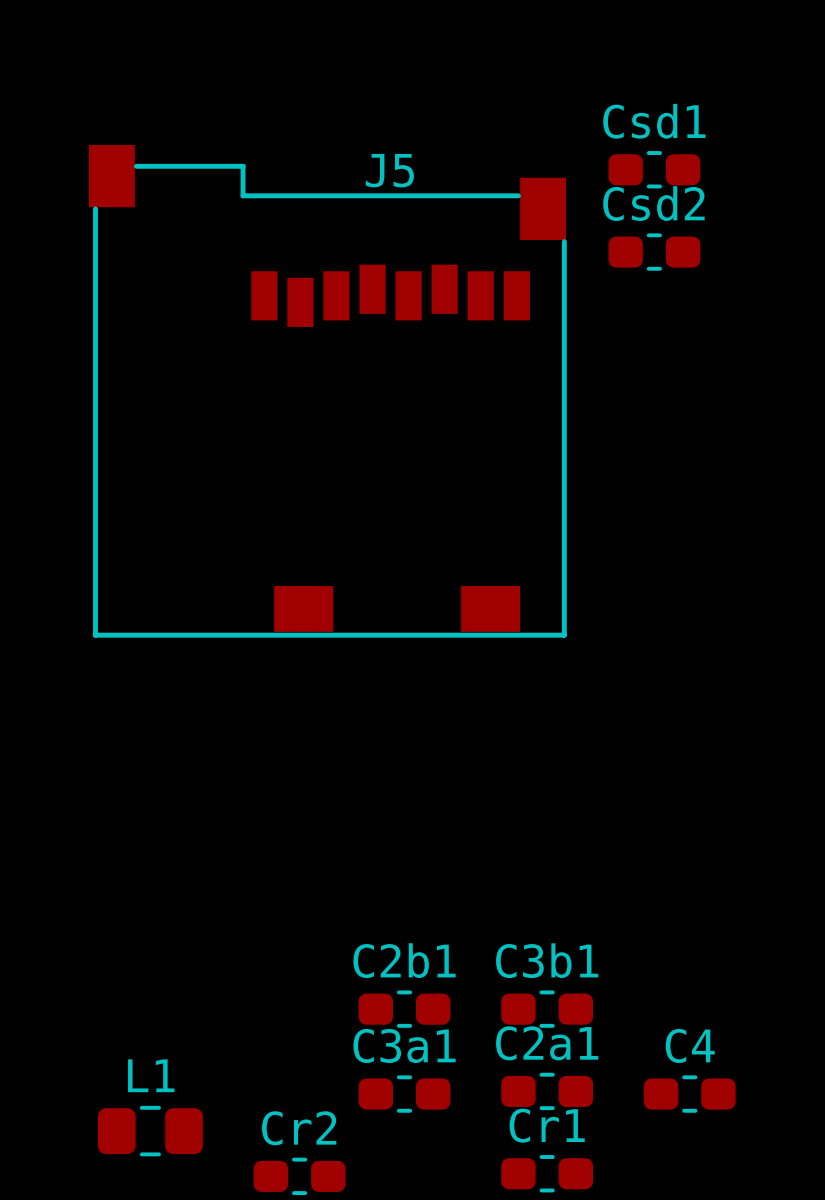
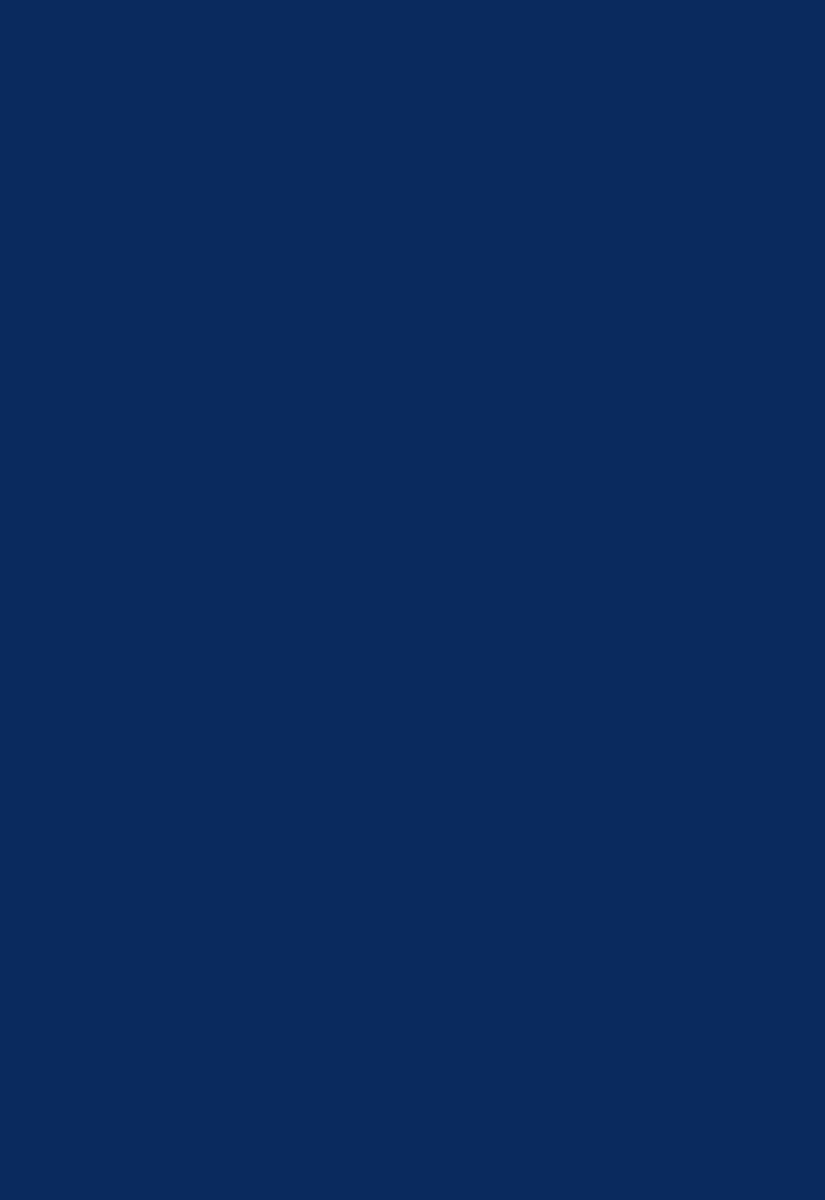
Csd1: (654, 169) -> none
Csd2: (654, 252) -> none
J5: (327, 391) -> none
C2b1: (404, 1009) -> none
C3b1: (547, 1009) -> none
C2a1: (547, 1091) -> none
C3a1: (404, 1094) -> none
C4: (689, 1094) -> none
L1: (150, 1131) -> none
Cr1: (547, 1173) -> none
Cr2: (299, 1176) -> none

